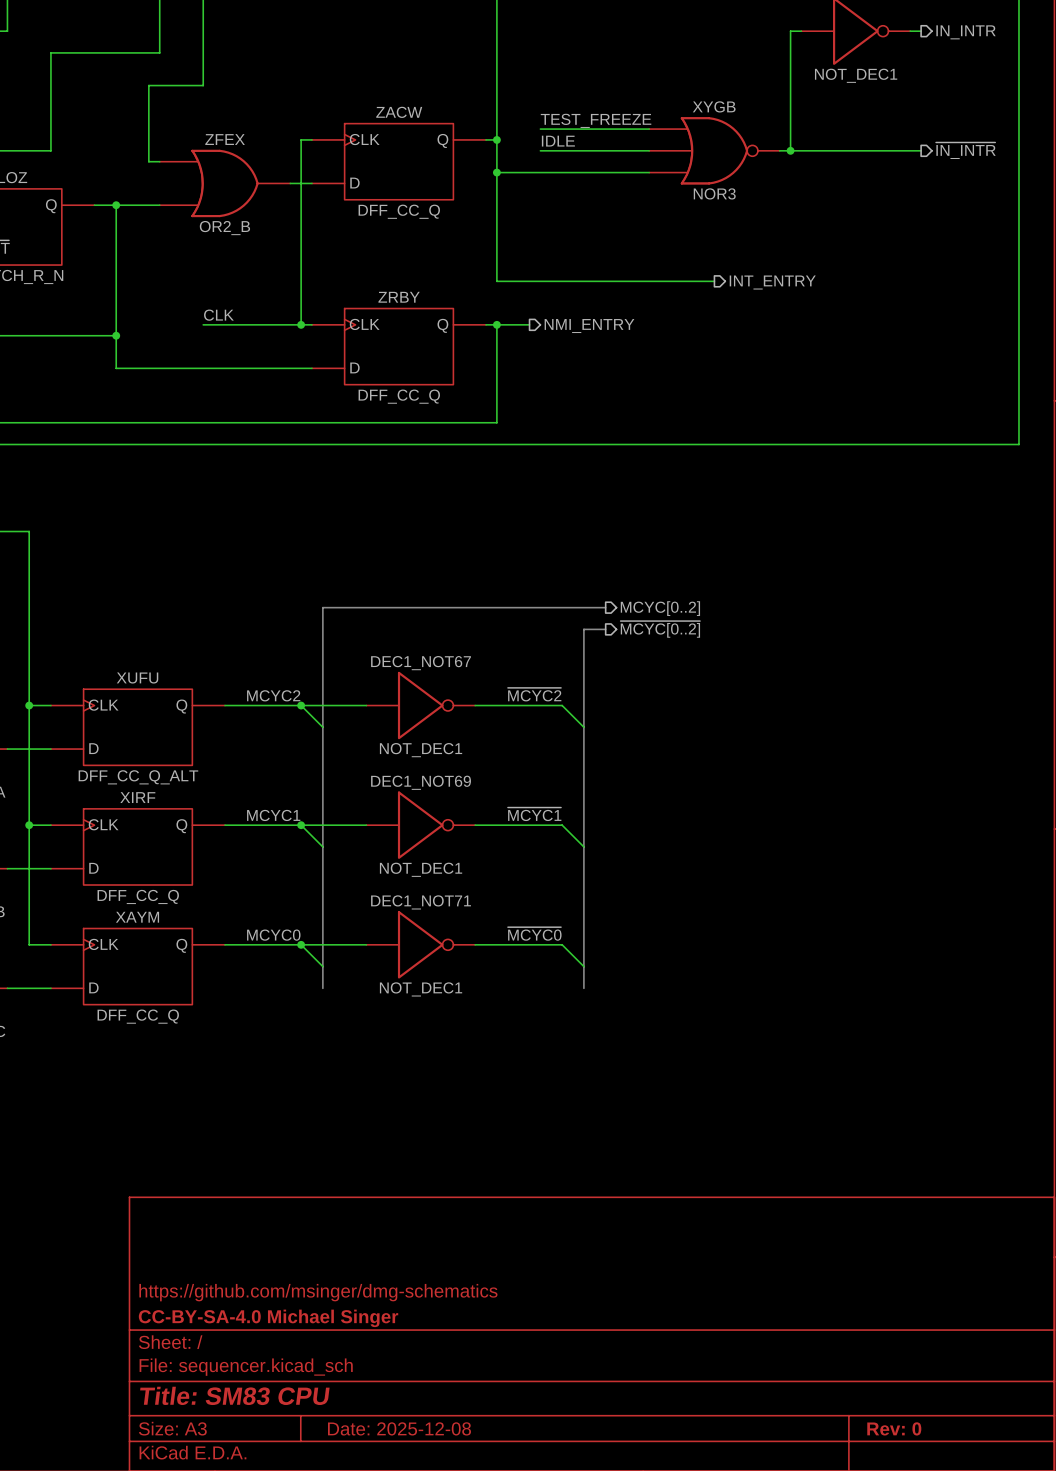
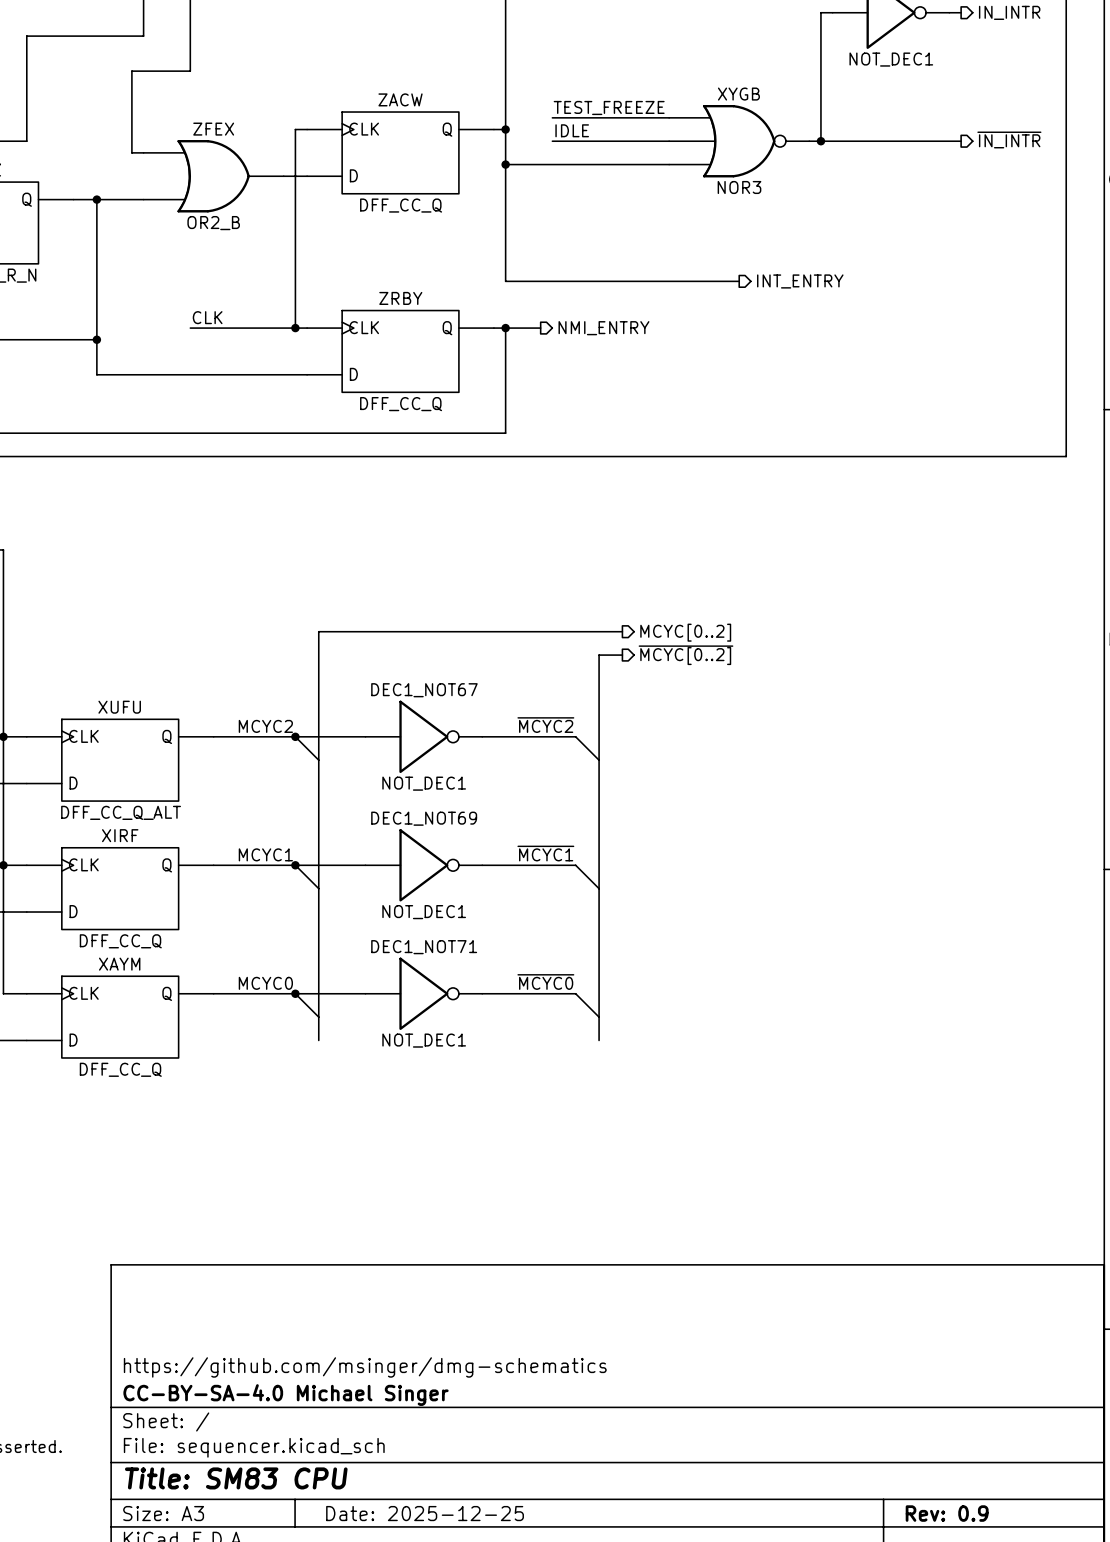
title block: Date: 2025-12-08 (399, 1428) -> Date: 2025-12-25 (425, 1513)
title block: Rev: 0 (894, 1428) -> Rev: 0.9 (947, 1513)

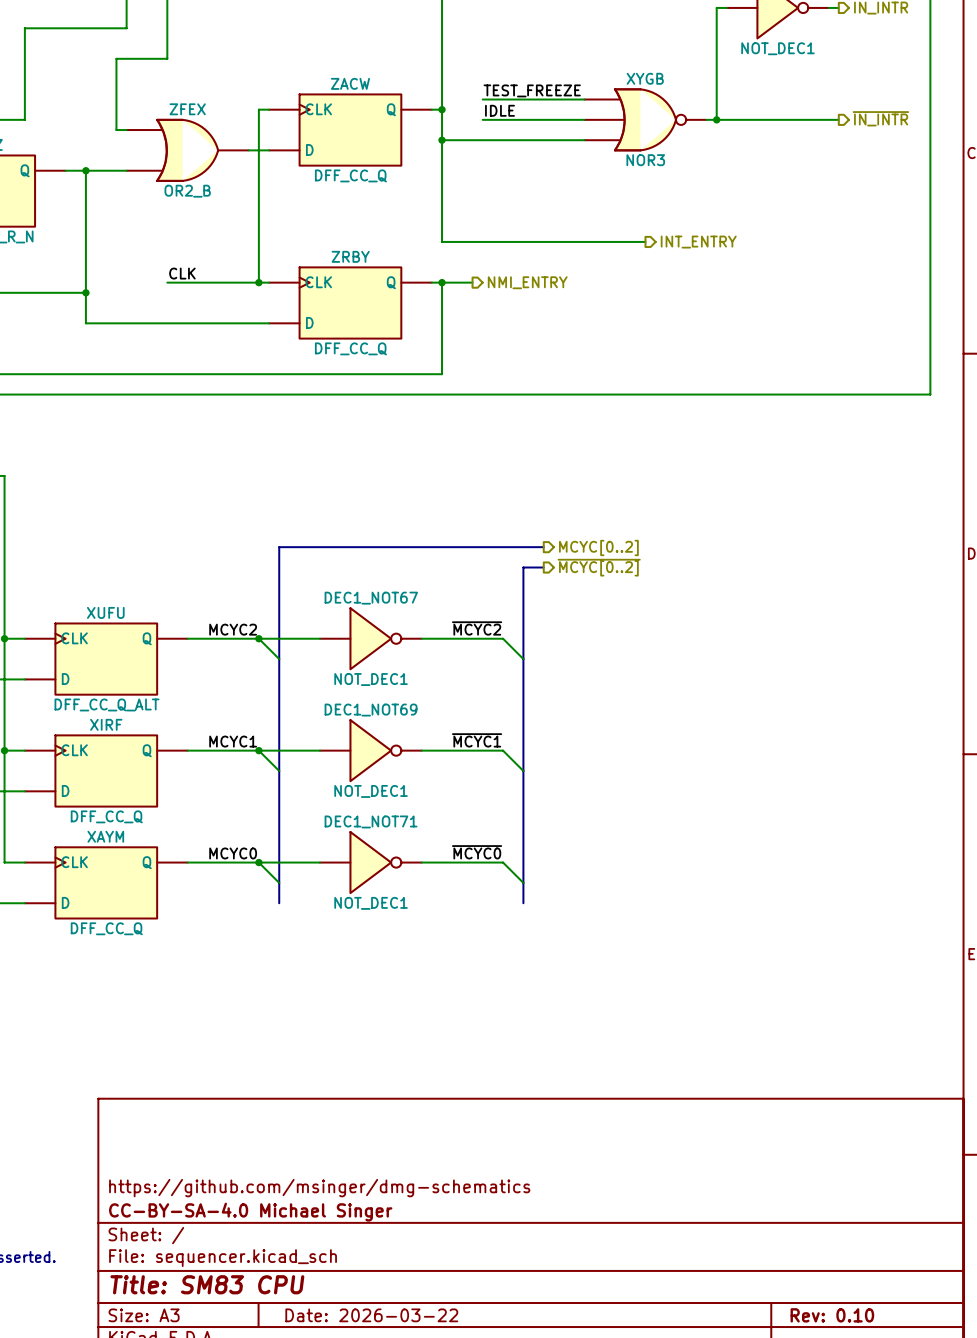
title block: Date: 2025-12-25 (425, 1513) -> Date: 2026-03-22 (371, 1315)
title block: Rev: 0.9 (947, 1513) -> Rev: 0.10 (832, 1315)

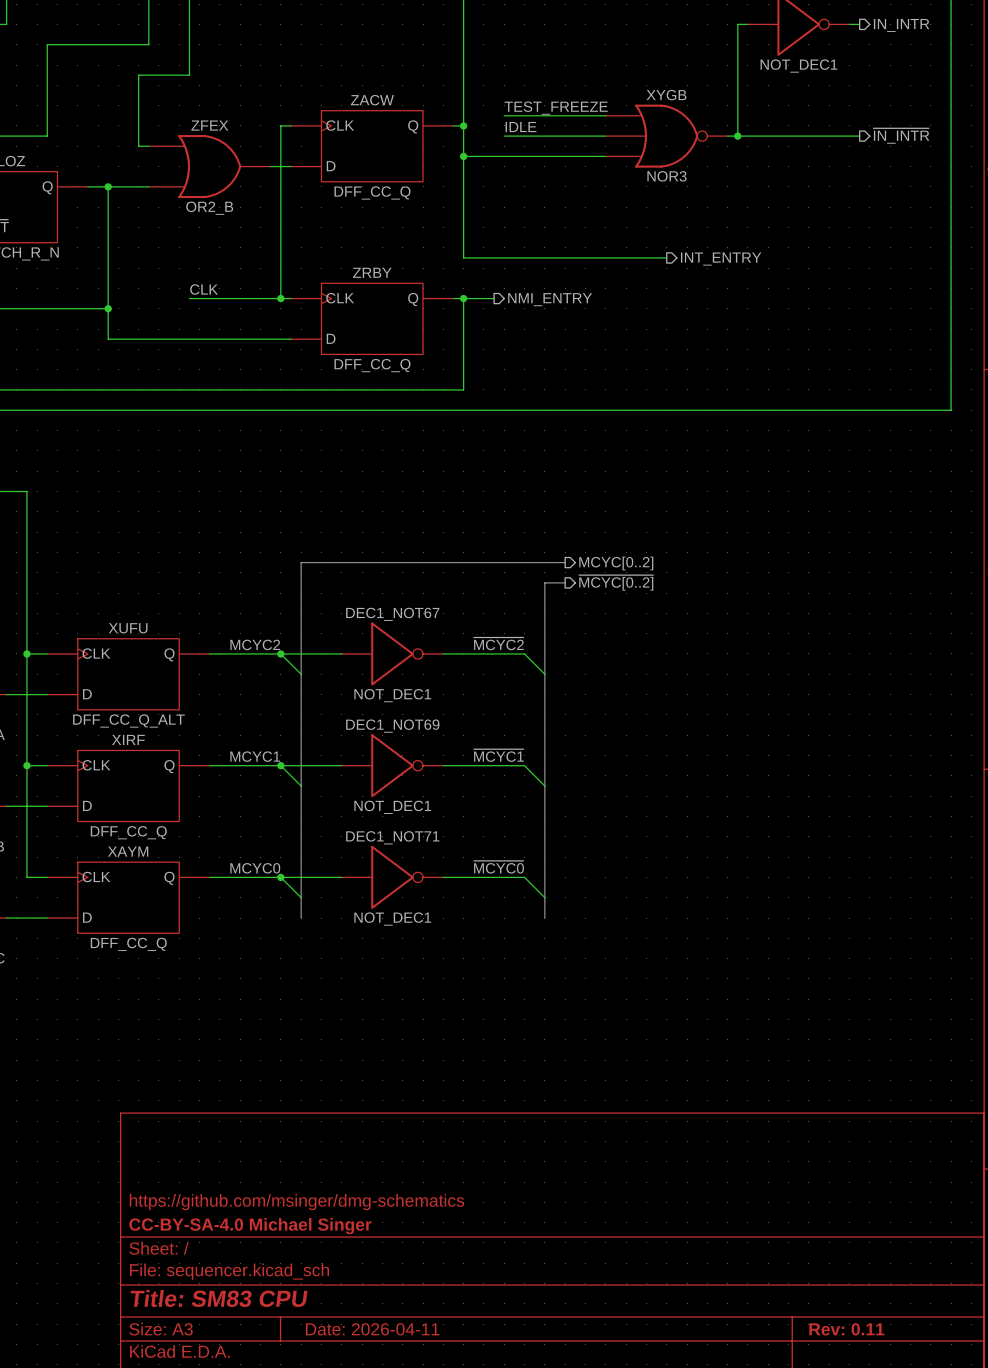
title block: Date: 2026-03-22 (371, 1315) -> Date: 2026-04-11 (372, 1329)
title block: Rev: 0.10 (832, 1315) -> Rev: 0.11 (846, 1329)

